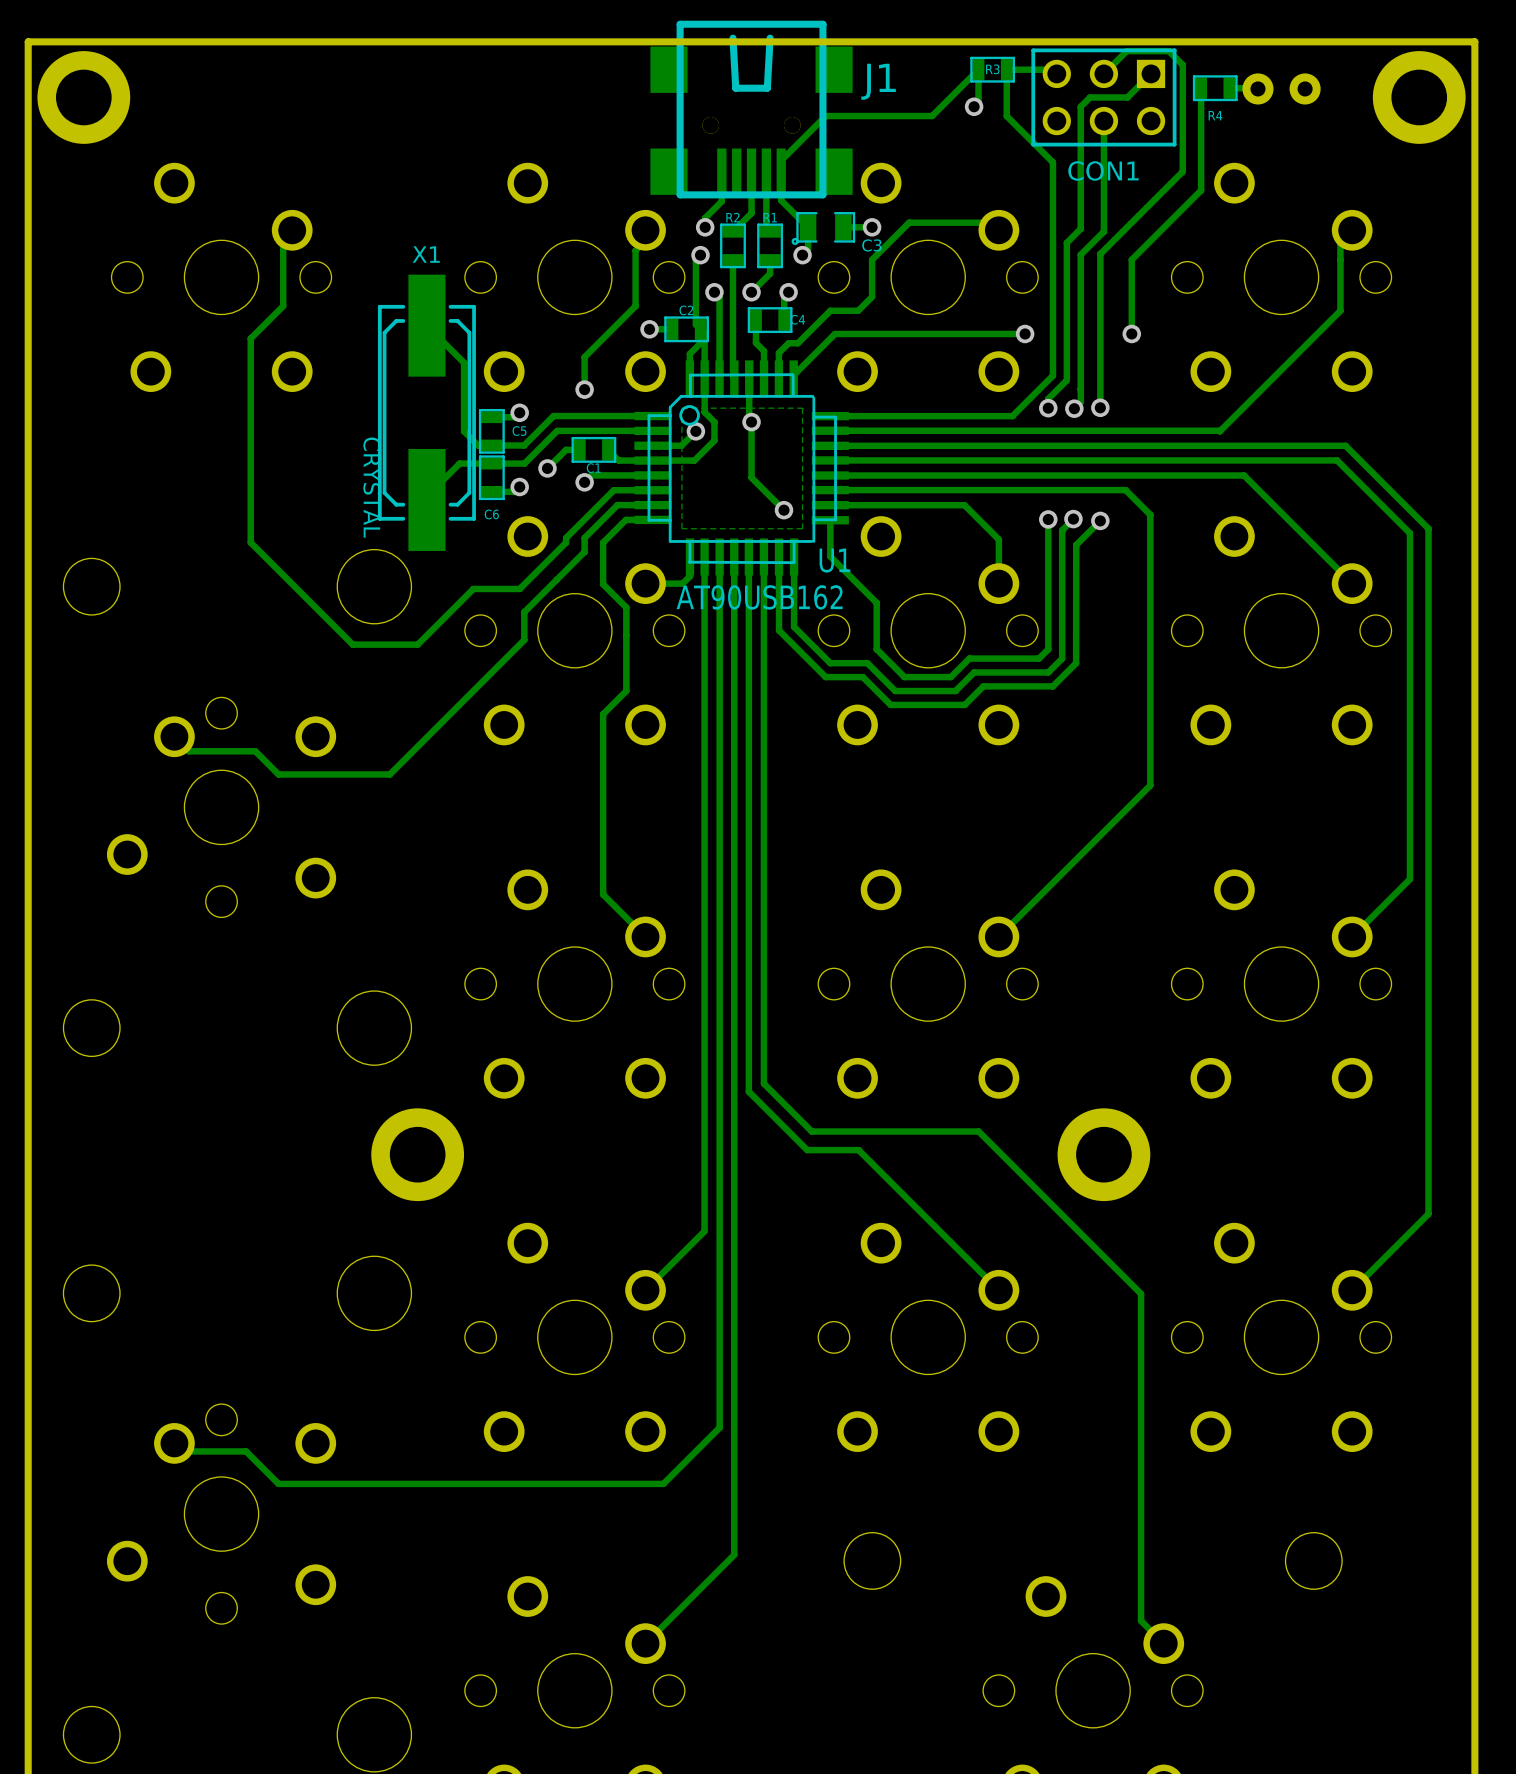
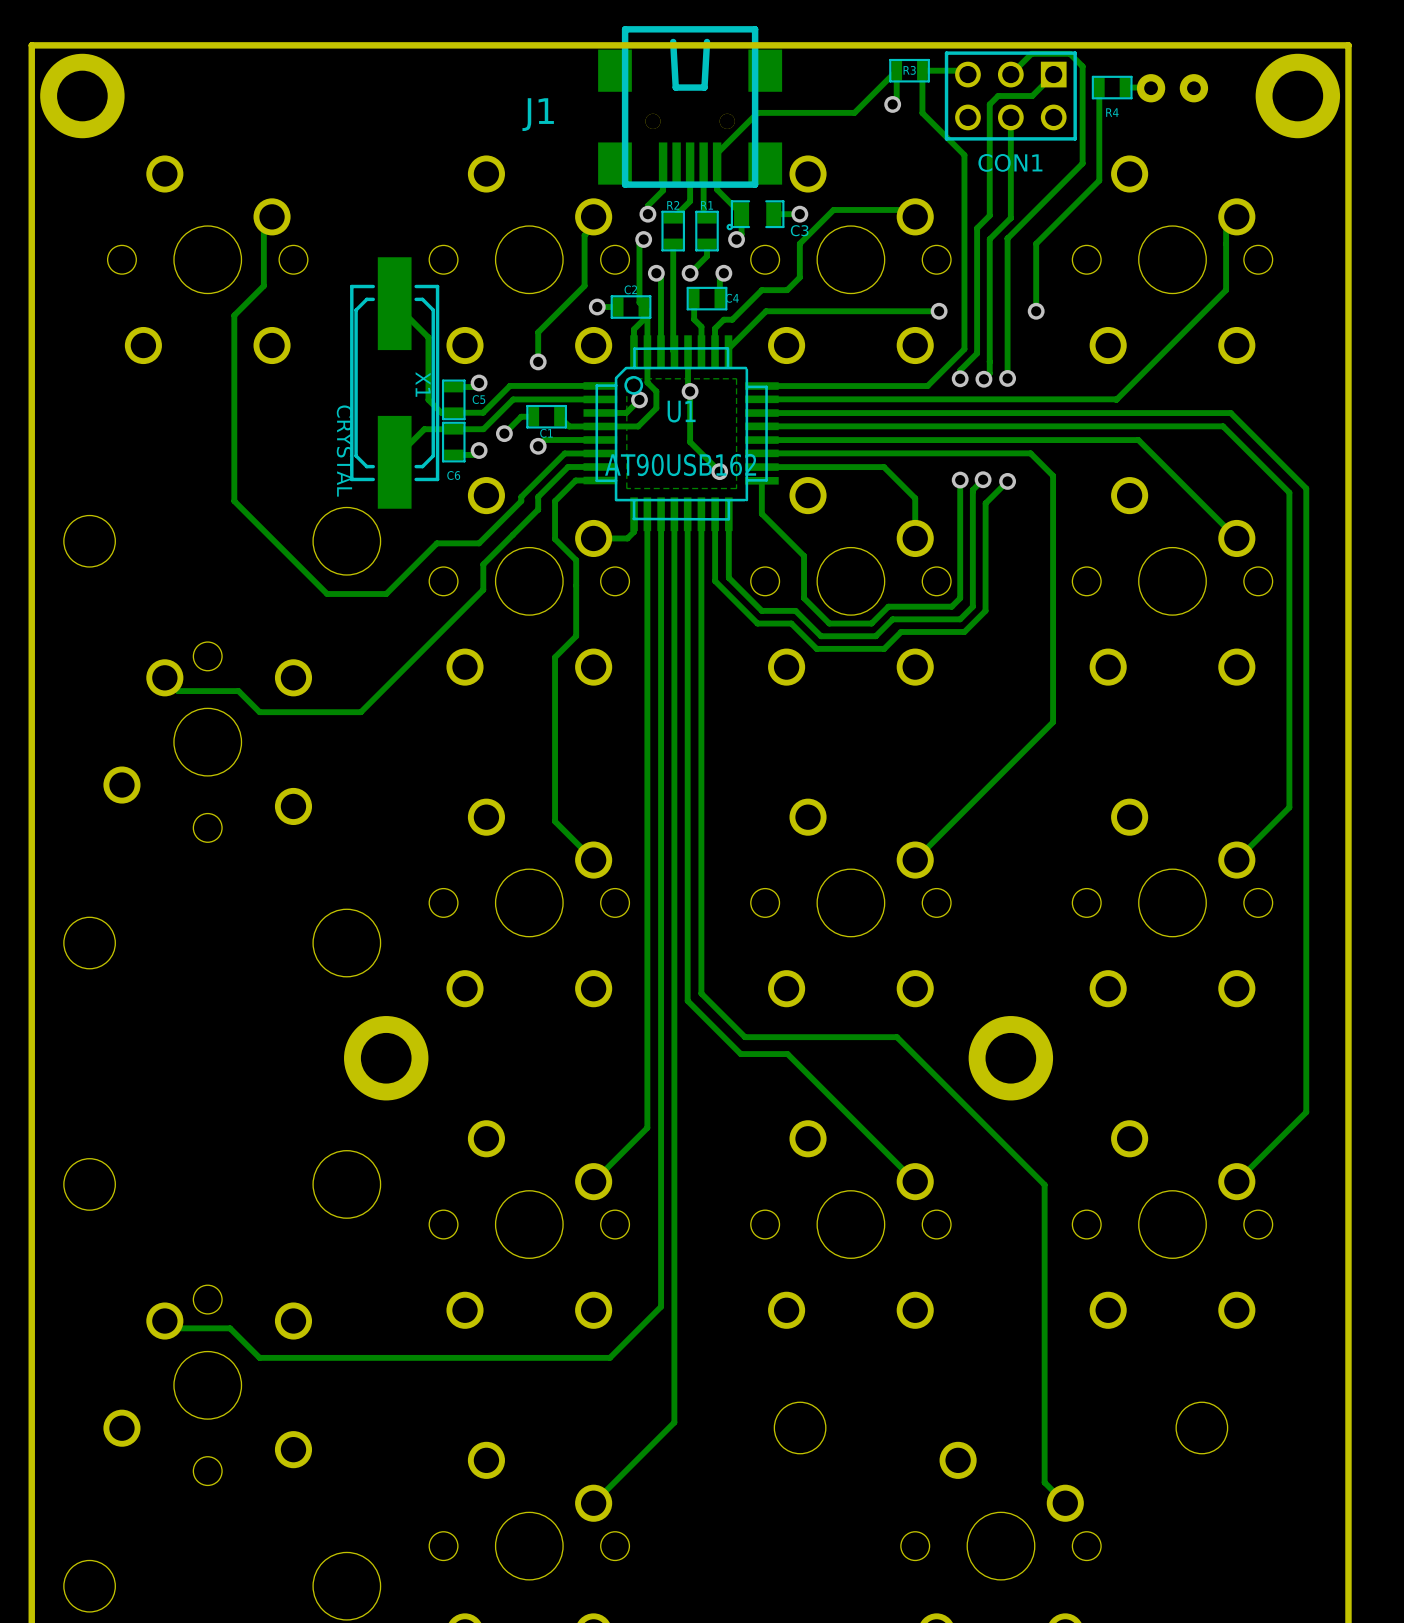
J1 name position: J1 (878, 81) -> J1 (538, 114)
X1 name rotation: 0° (426, 254) -> 90° clockwise (423, 384)
X1 name position: X1 (426, 254) -> X1 (423, 384)
U1 name position: U1 (834, 560) -> U1 (681, 411)
U1 value position: AT90USB162 (759, 597) -> AT90USB162 (680, 465)

